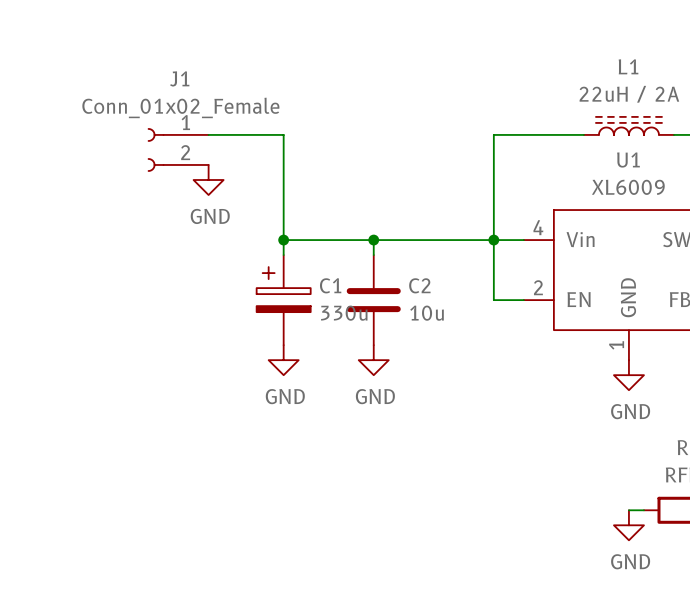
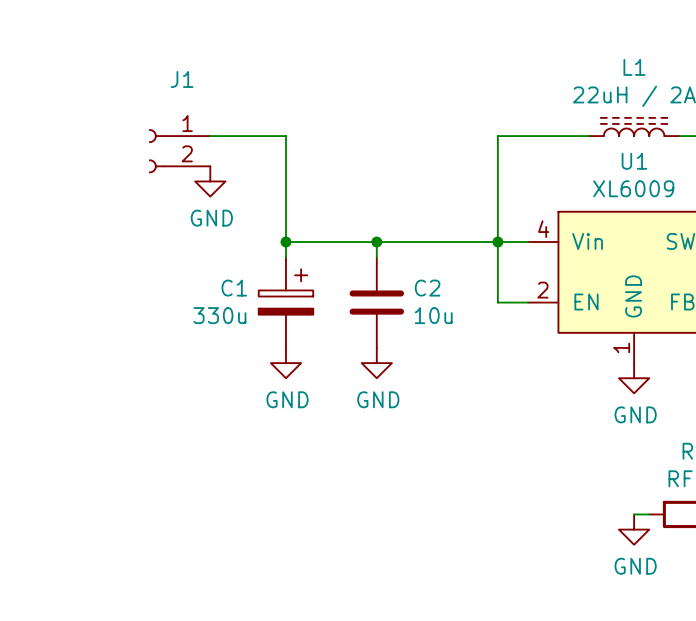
J1 value: Conn_01x02_Female (180, 107) -> none
C1 flip: as is (283, 289) -> left-right (285, 291)

